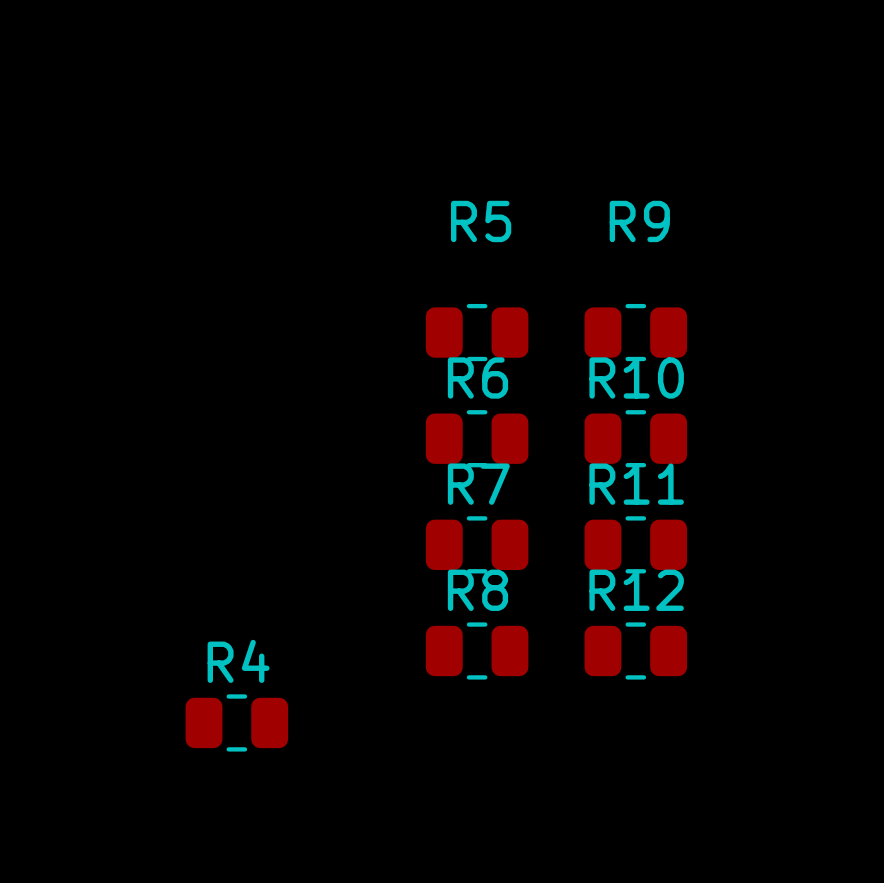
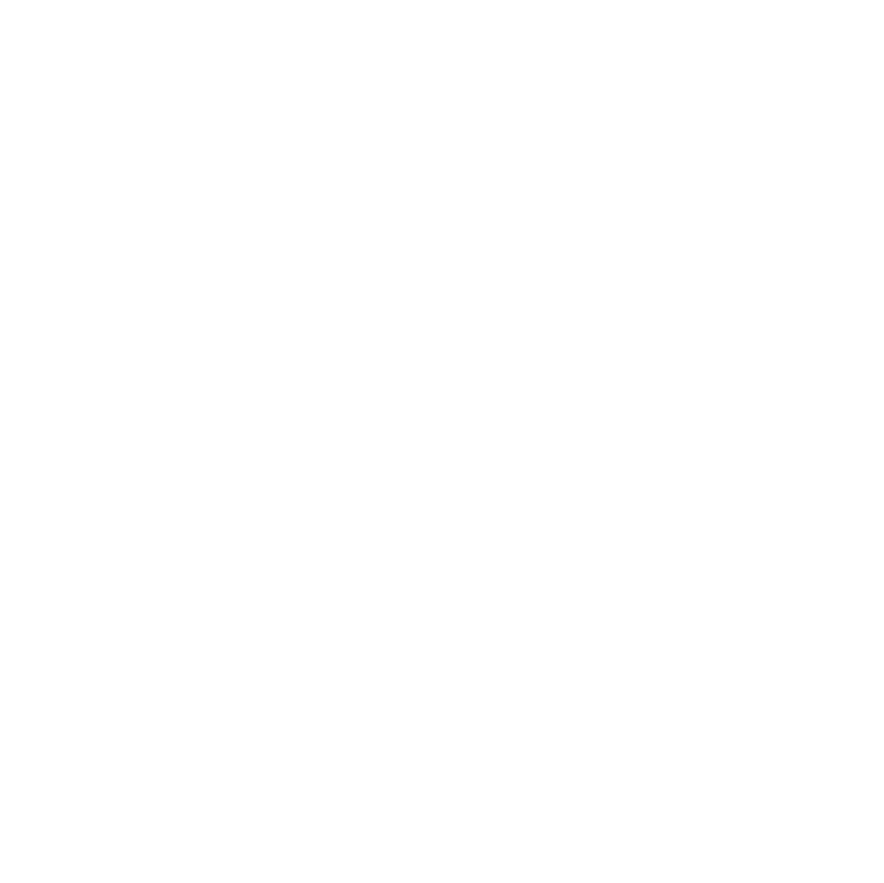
R5: (477, 332) -> none
R9: (635, 332) -> none
R6: (477, 438) -> none
R10: (635, 438) -> none
R7: (477, 544) -> none
R11: (635, 544) -> none
R8: (477, 650) -> none
R12: (635, 650) -> none
R4: (236, 722) -> none

